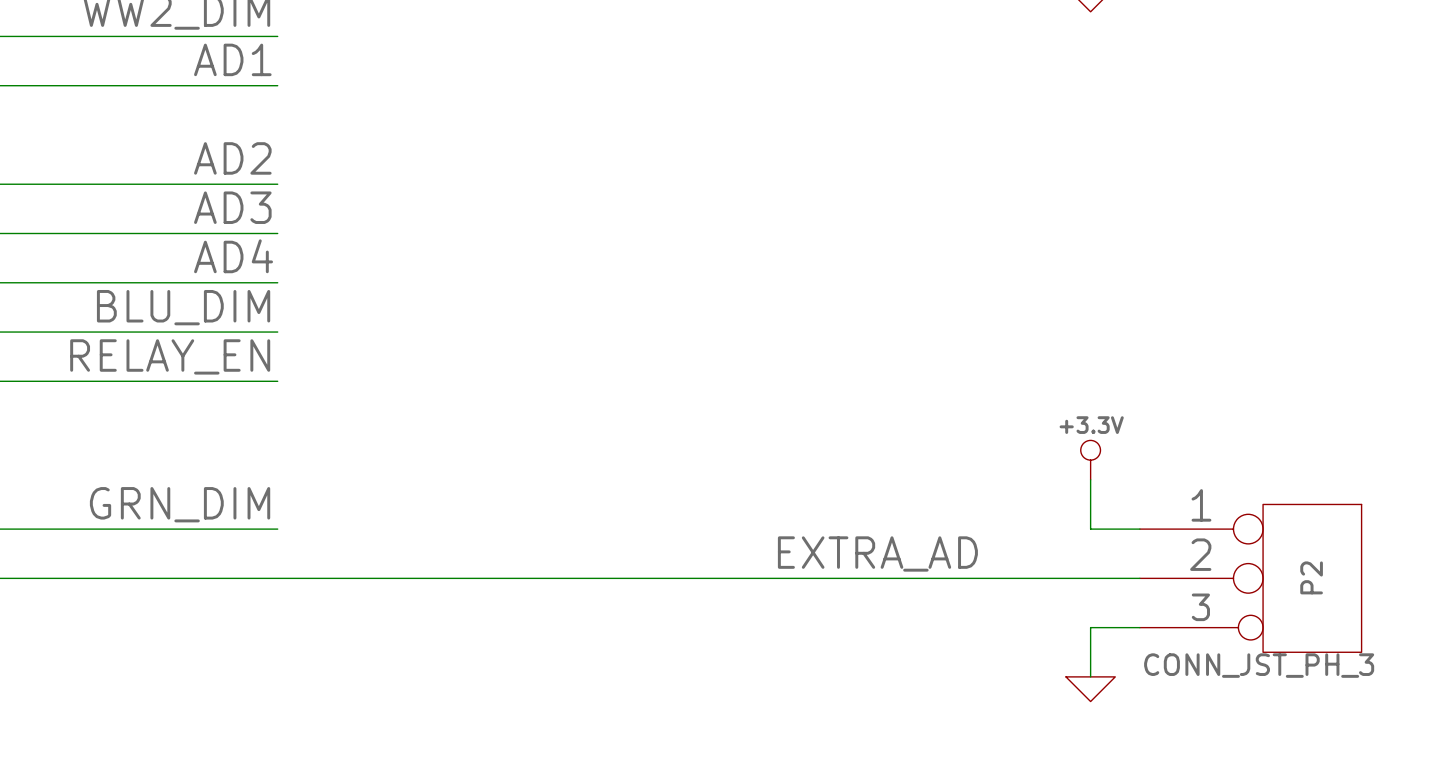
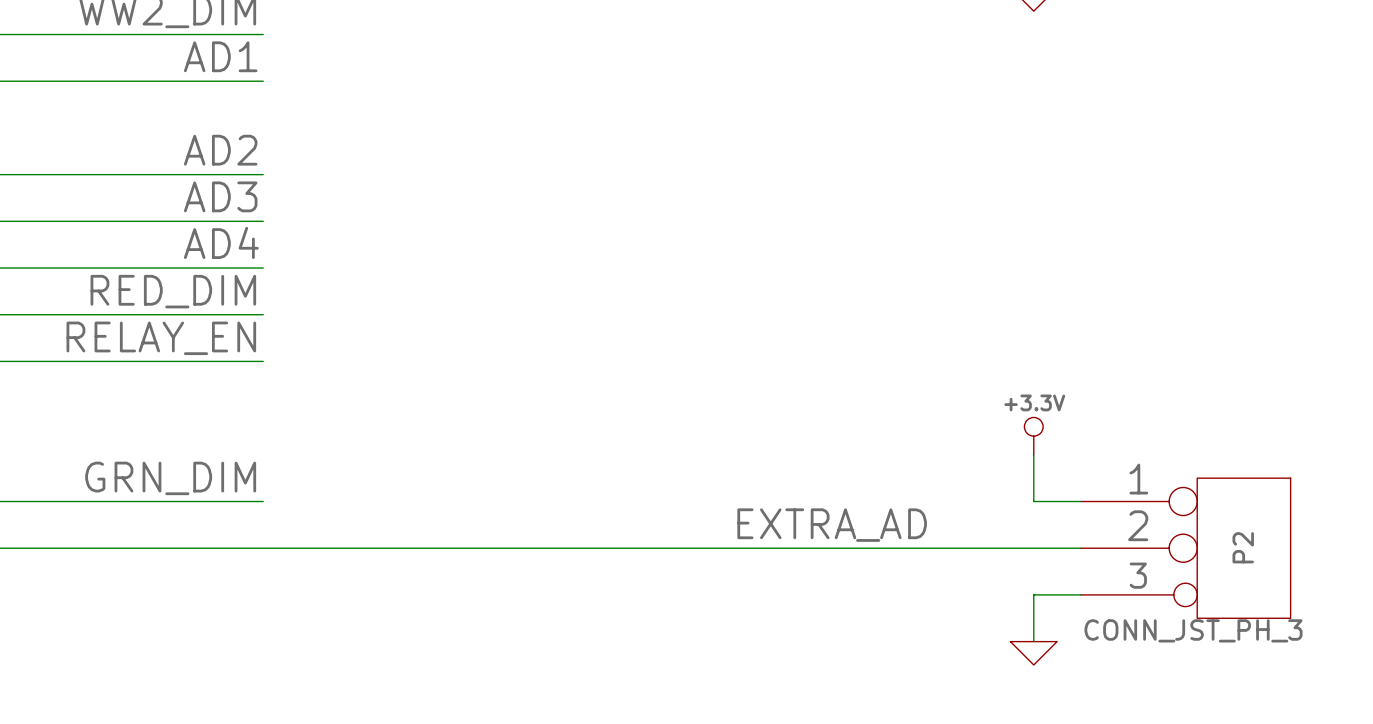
label: BLU_DIM (183, 307) -> RED_DIM (173, 291)

